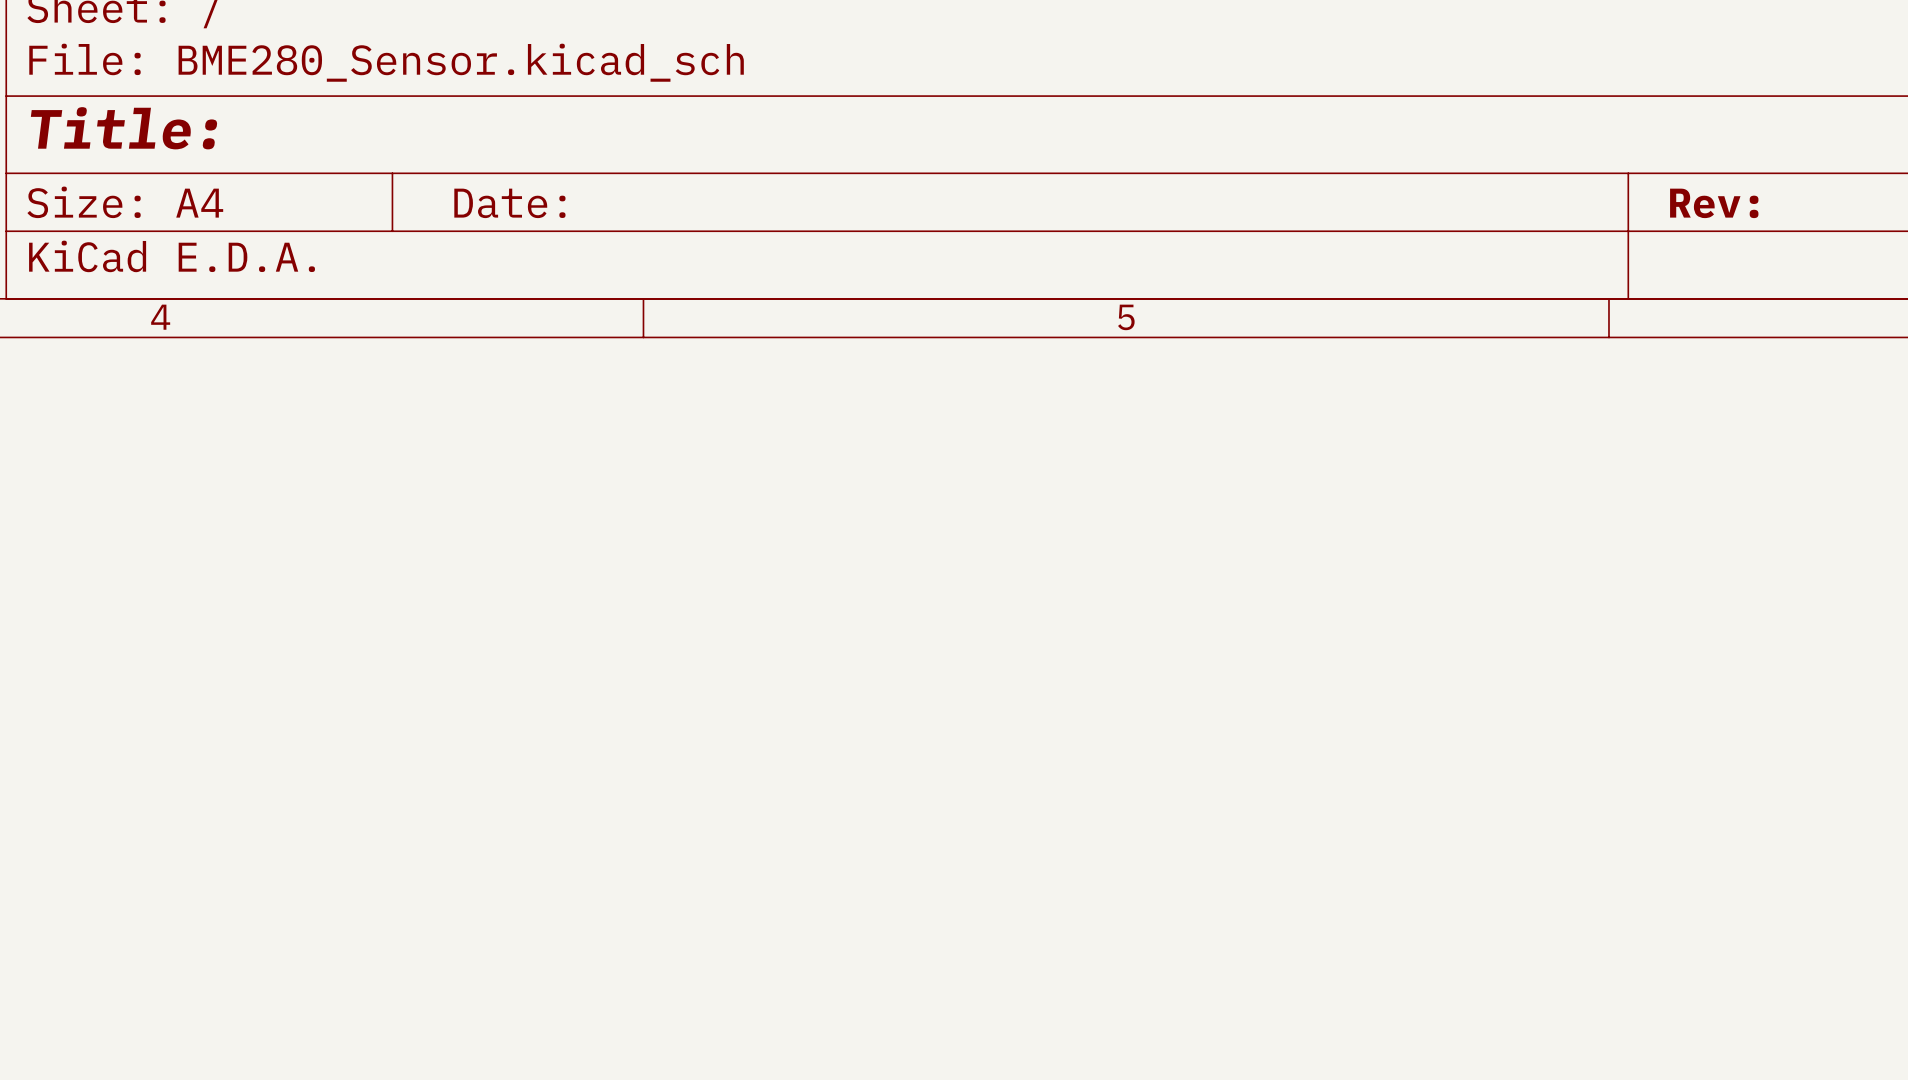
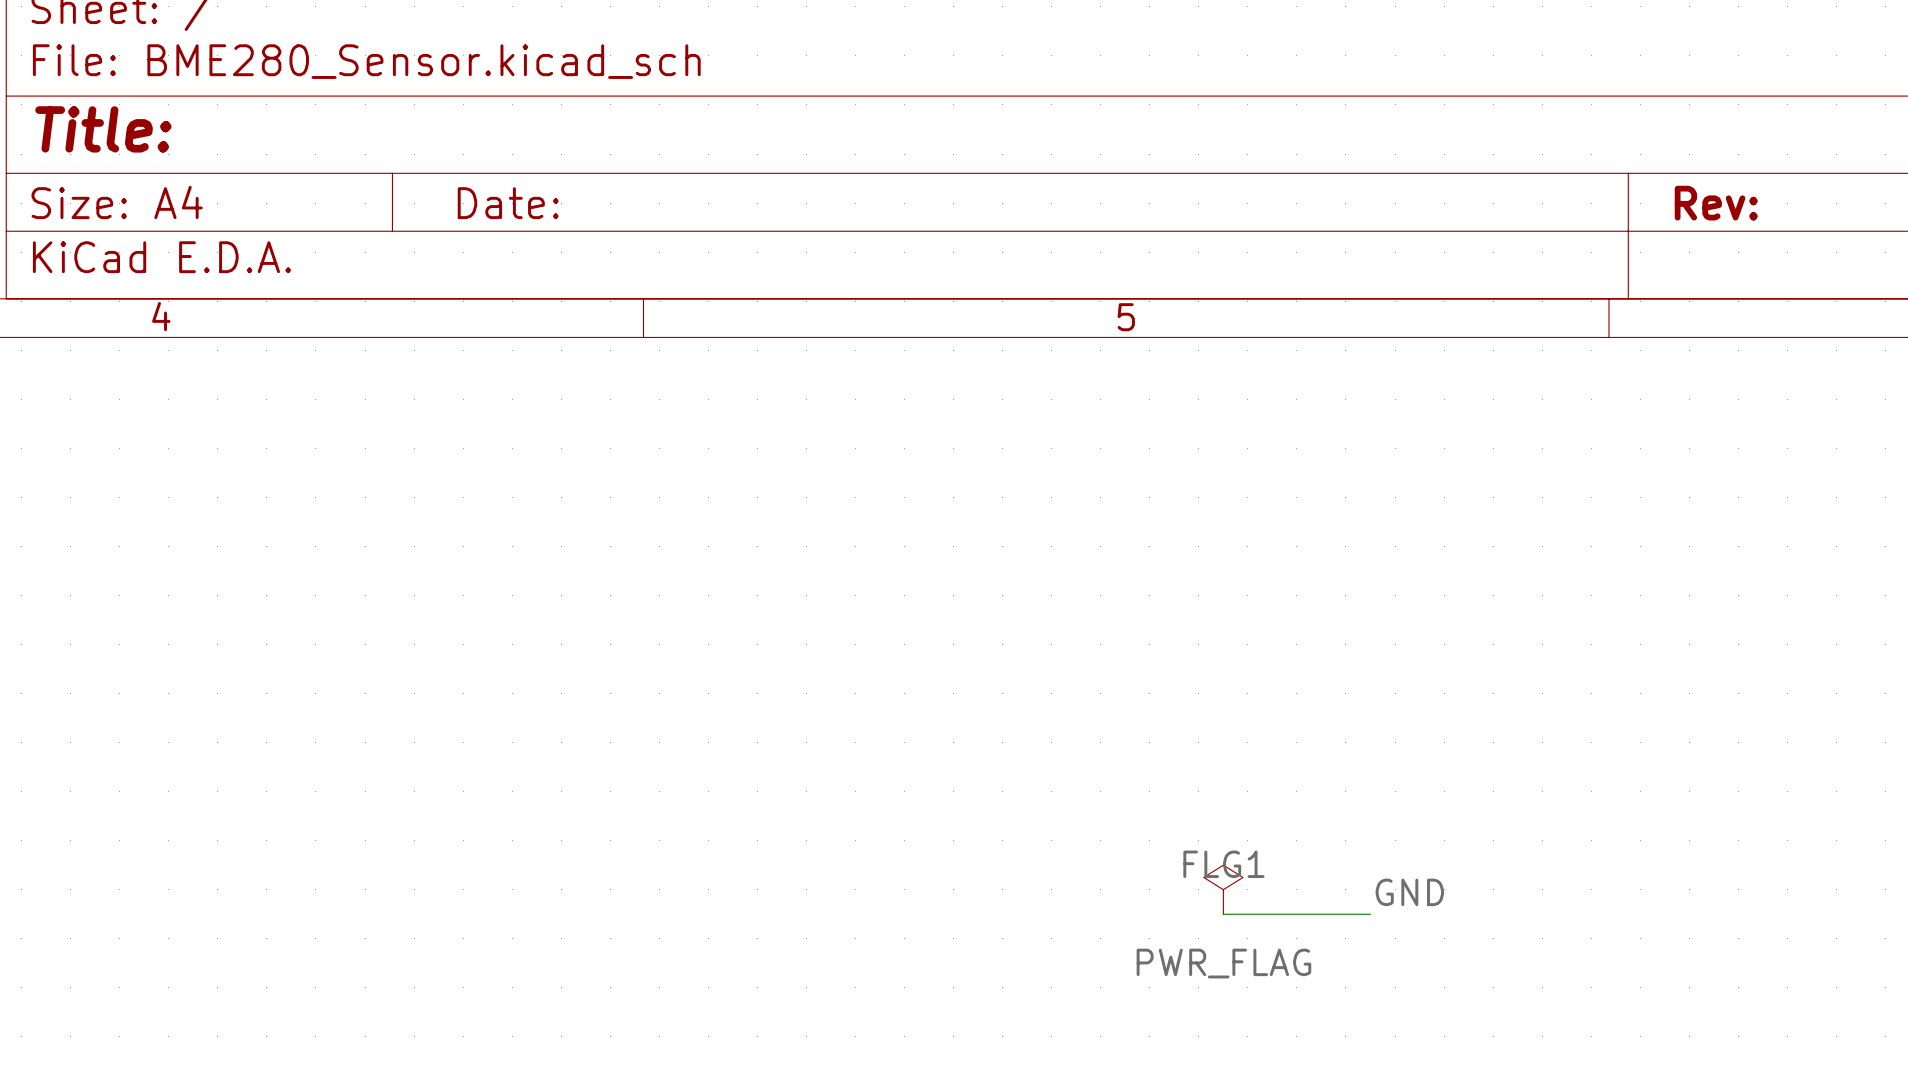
FLG1: none -> PWR_FLAG (1223, 889)
label: none -> GND (1409, 892)
wire: none -> (1223, 914) (1370, 914)

